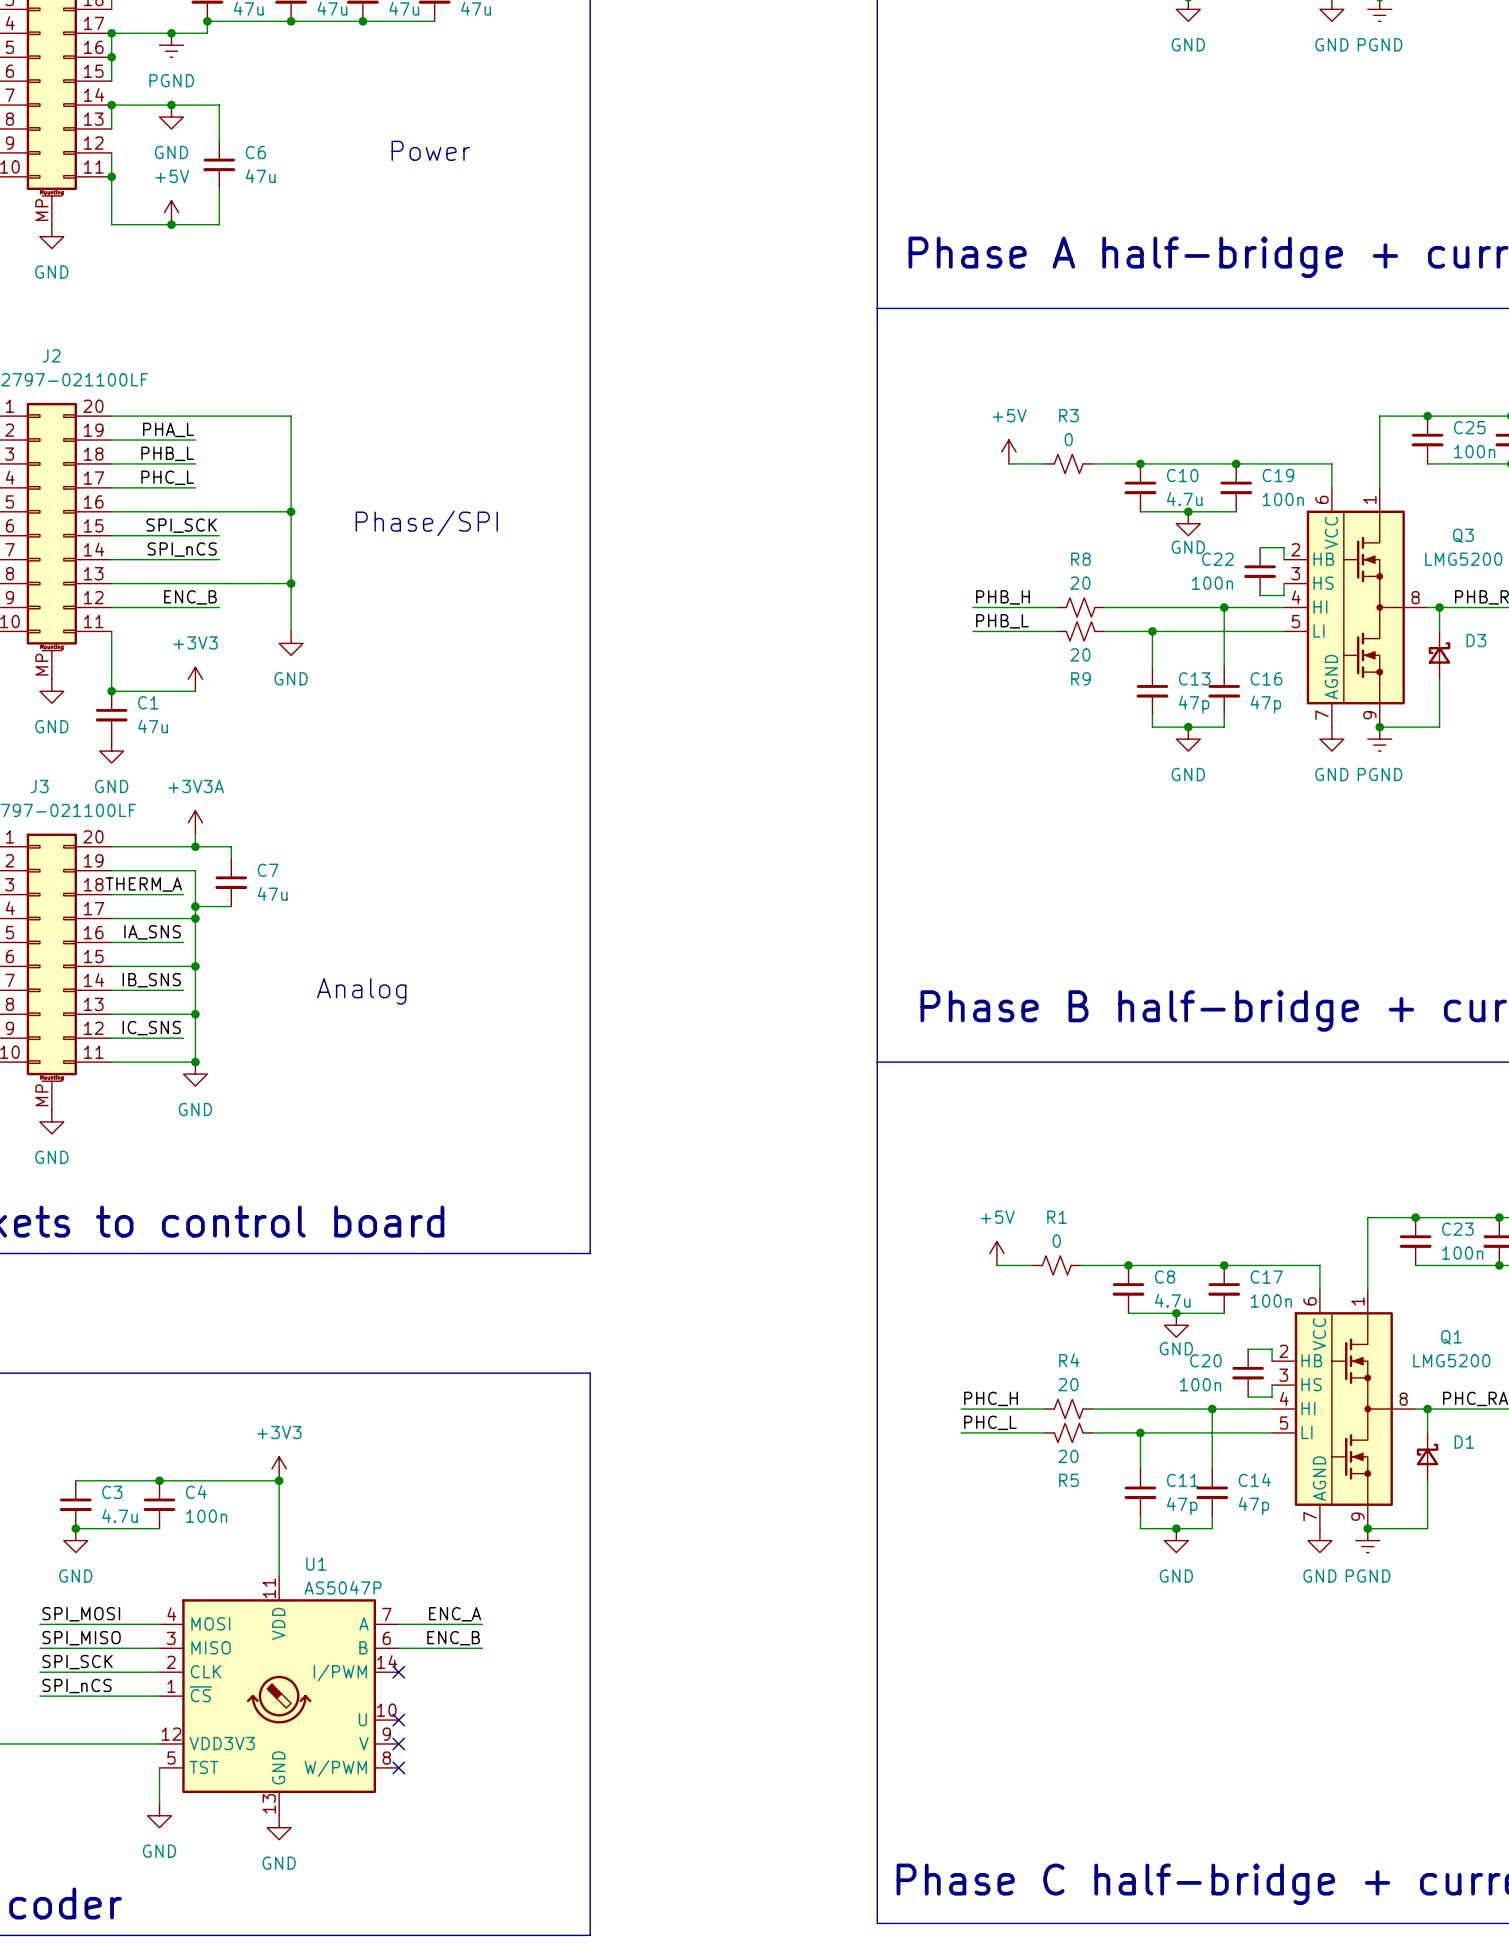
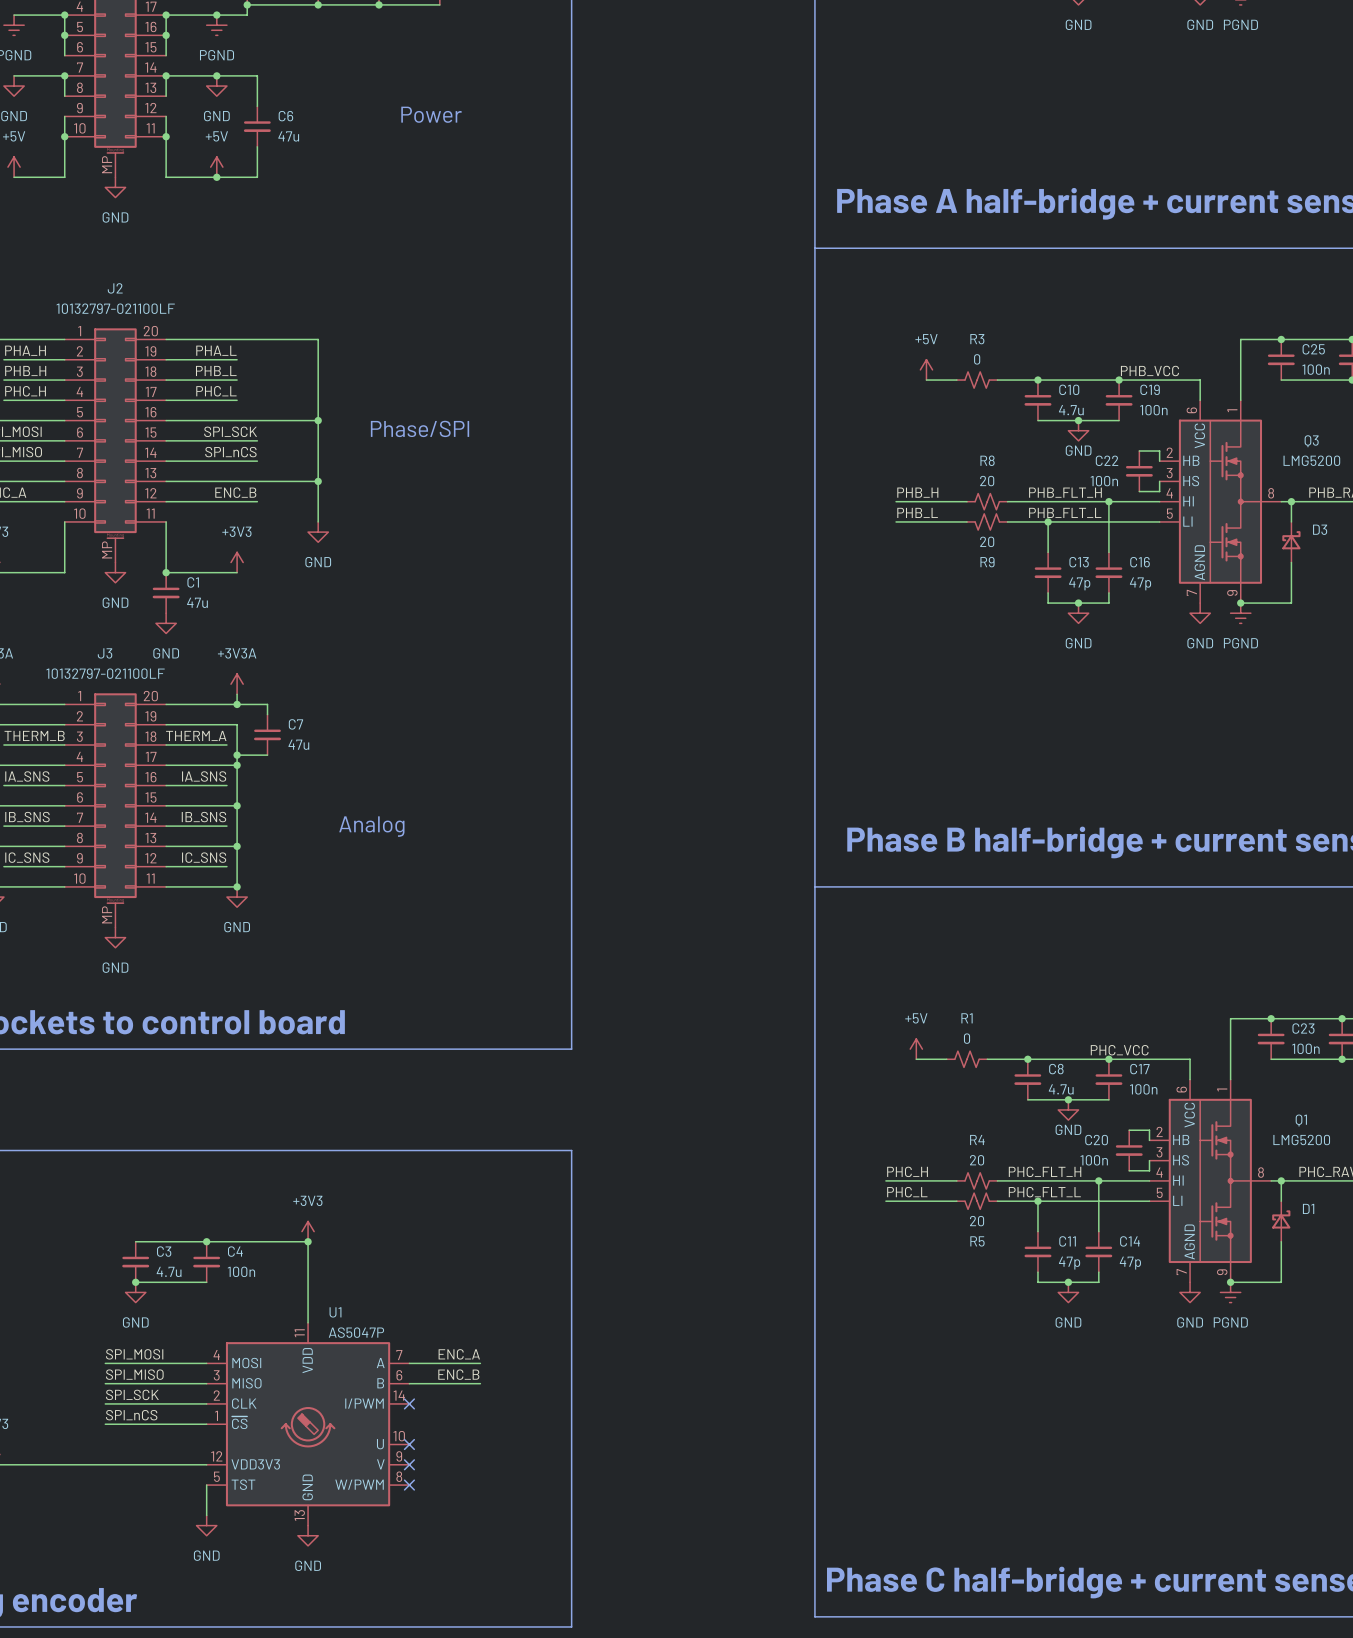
label: none -> PHB_VCC (1149, 370)
label: none -> PHB_FLT_H (1065, 492)
label: none -> PHB_FLT_L (1065, 512)
label: none -> PHC_VCC (1119, 1050)
label: none -> PHC_FLT_H (1045, 1171)
label: none -> PHC_FLT_L (1044, 1192)

